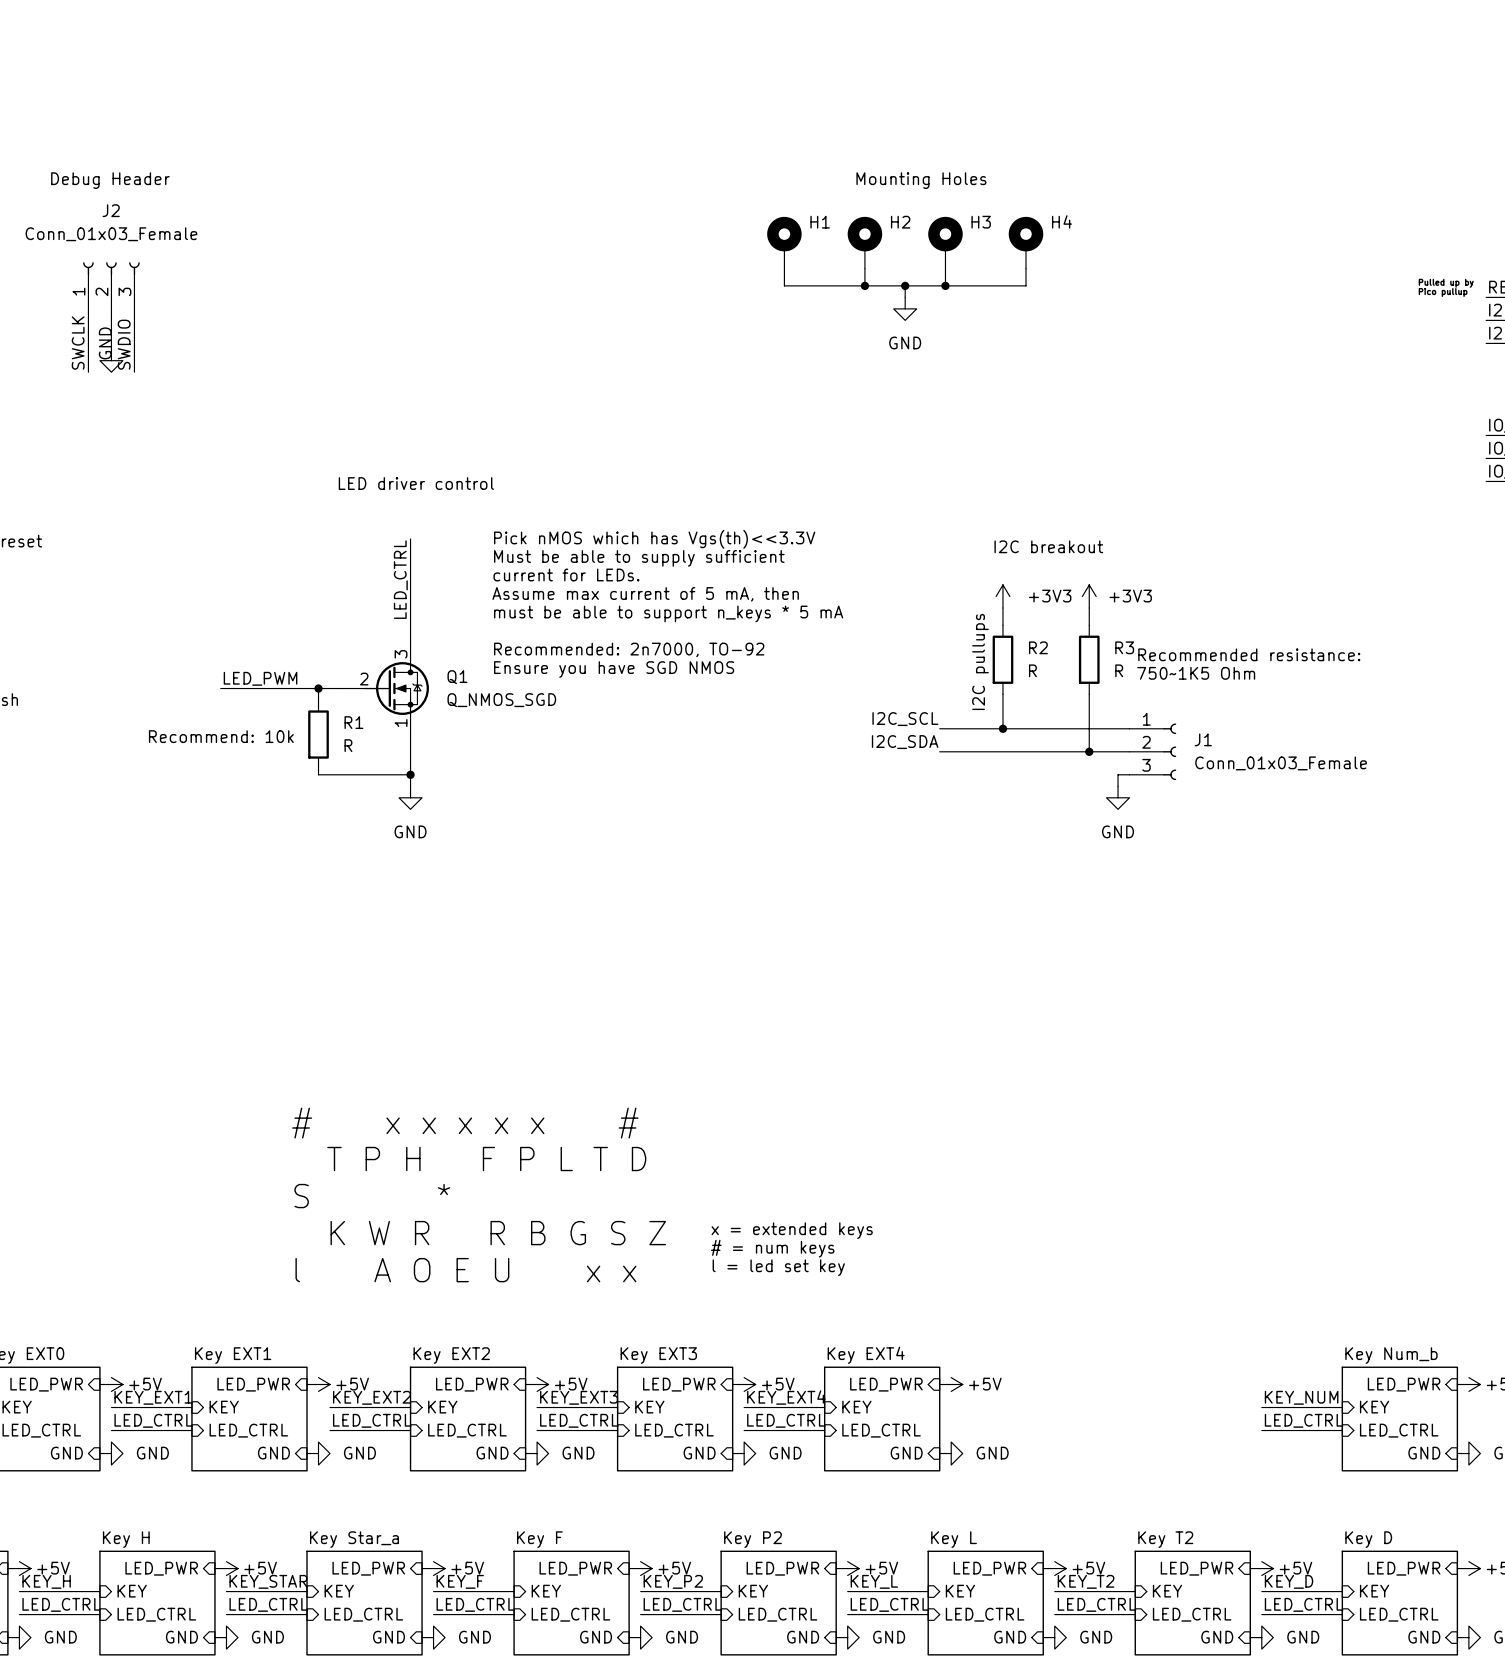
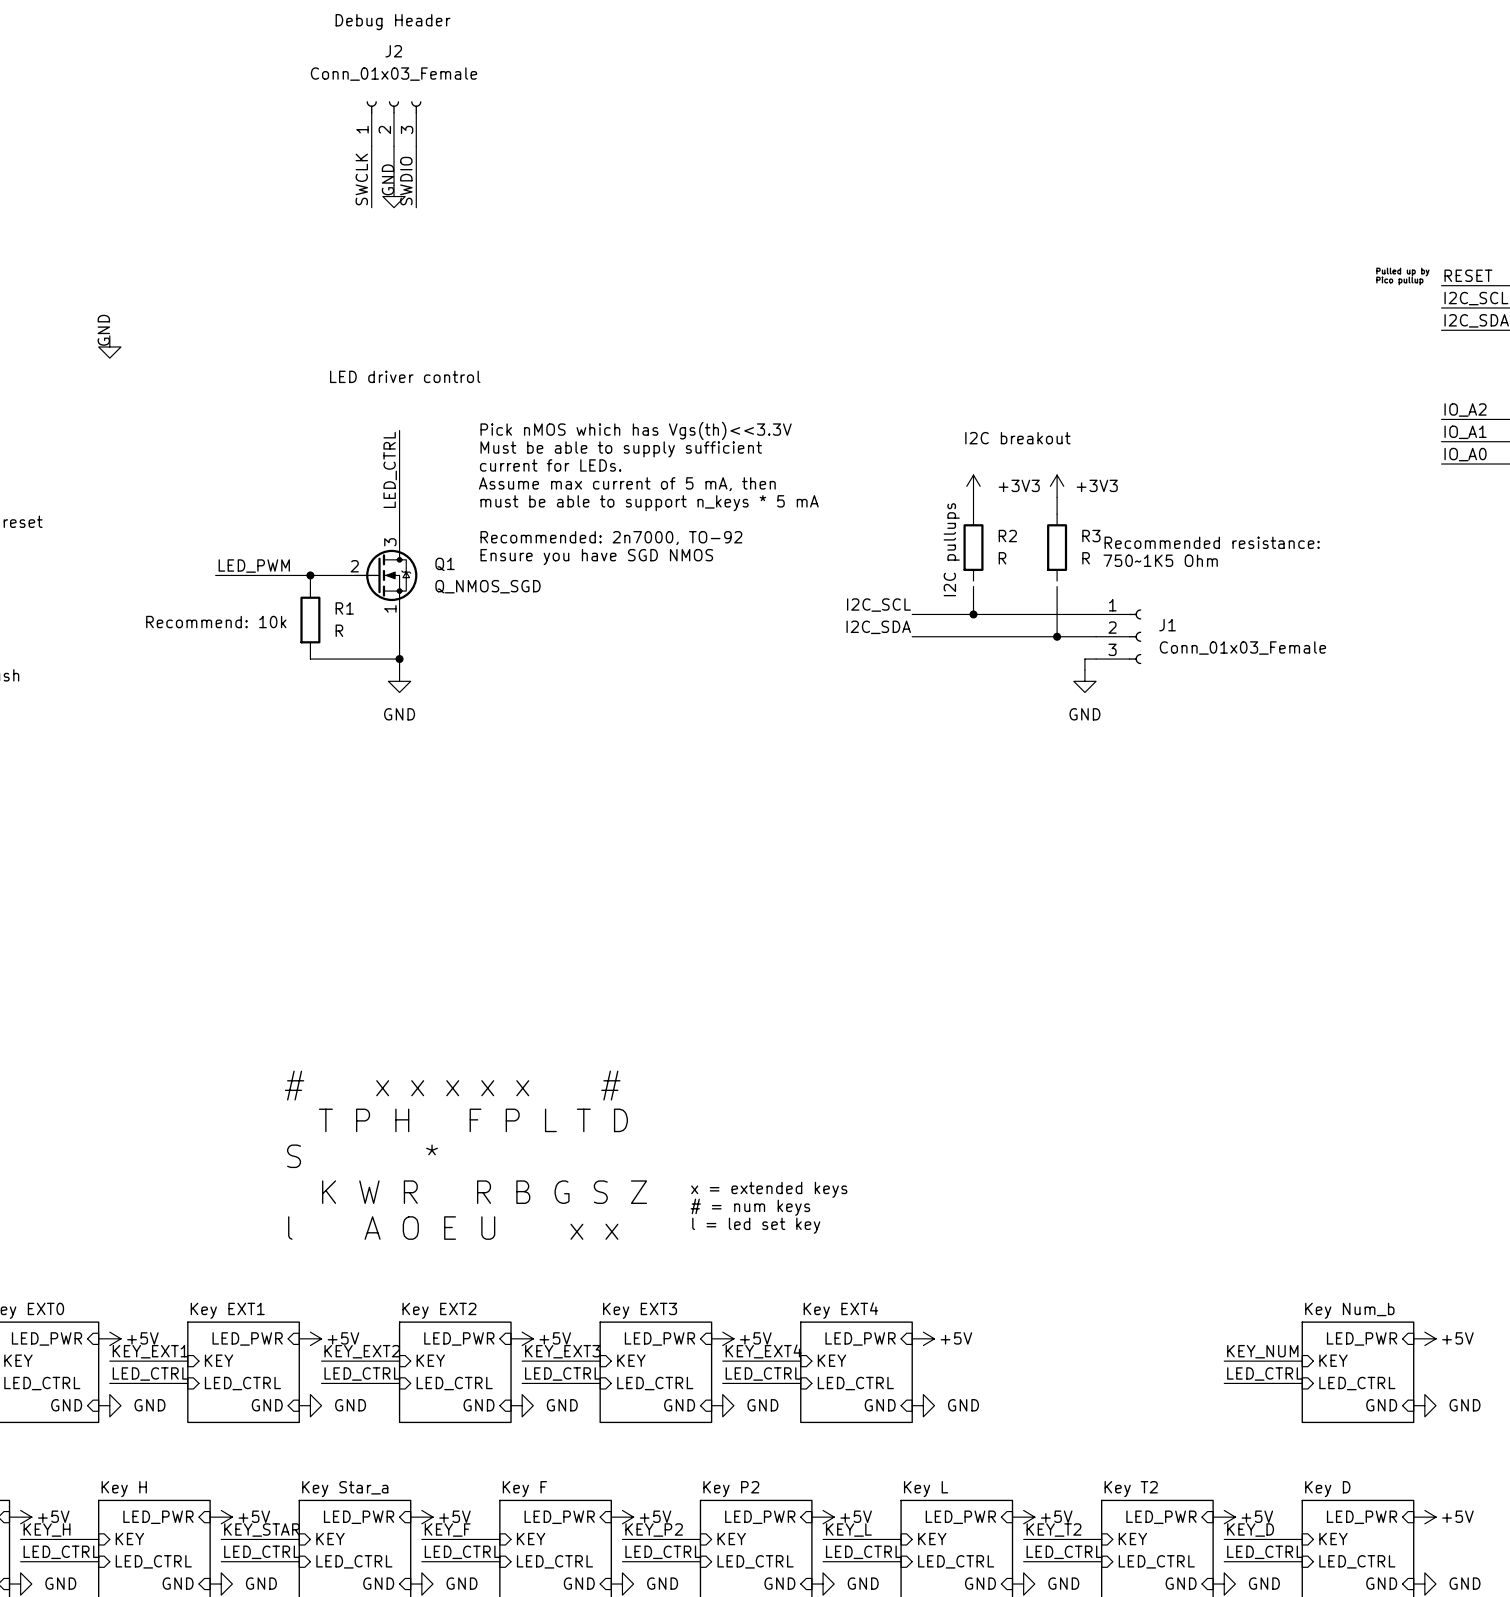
text: none -> Debug Header (393, 22)
wire: none -> (371, 146) (371, 207)
wire: none -> (394, 146) (394, 185)
wire: none -> (416, 146) (416, 207)
text: Debug Header (110, 180) -> none
text: Mounting Holes (921, 180) -> none
label: none -> SWCLK (361, 179)
label: none -> SWDIO (406, 181)
power symbol: none -> GND (394, 196)
H1: (784, 242) -> none
H2: (864, 242) -> none
H3: (945, 242) -> none
H4: (1025, 242) -> none
wire: (784, 268) (784, 285) (1025, 285) (1025, 268) -> none
wire: (864, 268) (864, 285) -> none
wire: (945, 268) (945, 285) -> none
J2 position: (111, 285) -> (394, 123)
junction: (864, 285) -> none
wire: (905, 285) (905, 297) -> none
junction: (905, 285) -> none
junction: (945, 285) -> none
wire: (88, 308) (88, 372) -> none
wire: (111, 308) (111, 349) -> none
wire: (134, 308) (134, 372) -> none
power symbol: GND (905, 308) -> none
label: SWCLK (78, 343) -> none
label: SWDIO (124, 344) -> none
wire: none -> (399, 430) (399, 519)
text: none -> Must be able to supply sufficient (621, 449)
text: none -> current for LEDs. (550, 465)
text position: LED driver control (416, 483) -> LED driver control (405, 376)
power symbol: none -> +3V3 (973, 486)
power symbol: none -> +3V3 (1057, 486)
wire: none -> (973, 497) (973, 514)
wire: none -> (1057, 497) (1057, 514)
text position: Pick nMOS which has Vgs(th)<<3.3V (654, 539) -> Pick nMOS which has Vgs(th)<<3.3V (636, 430)
text position: I2C breakout (1048, 546) -> I2C breakout (1017, 438)
text: Must be able to supply sufficient (639, 558) -> Recommended: 2n7000, TO-92 (611, 538)
text: current for LEDs. (566, 574) -> Ensure you have SGD NMOS (596, 557)
label position: LED_CTRL (400, 579) -> LED_CTRL (390, 469)
text position: Assume max current of 5 mA, then (645, 594) -> Assume max current of 5 mA, then (627, 484)
junction: none -> (310, 575)
power symbol: +3V3 (1002, 596) -> none
power symbol: +3V3 (1089, 596) -> none
text position: must be able to support n_keys * 5 mA (668, 613) -> must be able to support n_keys * 5 mA (649, 503)
junction: none -> (973, 614)
text: Recommended: 2n7000, TO-92 (629, 649) -> none
text position: Recommended resistance: (1249, 654) -> Recommended resistance: (1212, 542)
R2 position: (1002, 659) -> (973, 547)
junction: none -> (1057, 636)
R3 position: (1089, 659) -> (1057, 547)
text position: I2C pullups (980, 661) -> I2C pullups (951, 549)
text: Ensure you have SGD NMOS (614, 669) -> none
text position: 750~1K5 Ohm (1196, 673) -> 750~1K5 Ohm (1160, 560)
label position: LED_PWM (260, 678) -> LED_PWM (254, 566)
junction: none -> (399, 659)
wire: (220, 688) (341, 688) -> (215, 575) (332, 575)
wire: (318, 688) (318, 700) -> (310, 575) (310, 586)
junction: (318, 688) -> none
Q1 position: (385, 688) -> (375, 575)
wire: (1002, 694) (1002, 728) -> (1057, 603) (1057, 636)
wire: (1089, 694) (1089, 751) -> none
label position: I2C_SCL (905, 719) -> I2C_SCL (878, 605)
wire: (939, 728) (1129, 728) -> (912, 614) (1096, 614)
junction: (1002, 728) -> none
R1 position: (318, 734) -> (310, 620)
wire: (410, 734) (410, 786) -> none
text position: Recommend: 10k (221, 736) -> Recommend: 10k (216, 622)
label position: I2C_SDA (905, 742) -> I2C_SDA (878, 627)
wire: (939, 751) (1129, 751) -> (912, 636) (1096, 636)
junction: (1089, 751) -> none
J1 position: (1152, 751) -> (1118, 636)
wire: (318, 769) (318, 774) (410, 774) -> (310, 653) (310, 659) (399, 659)
junction: (410, 774) -> none
wire: (1129, 774) (1118, 774) (1118, 786) -> (1096, 659) (1084, 659) (1084, 670)
power symbol position: GND (410, 797) -> GND (399, 681)
power symbol position: GND (1118, 797) -> GND (1084, 681)

